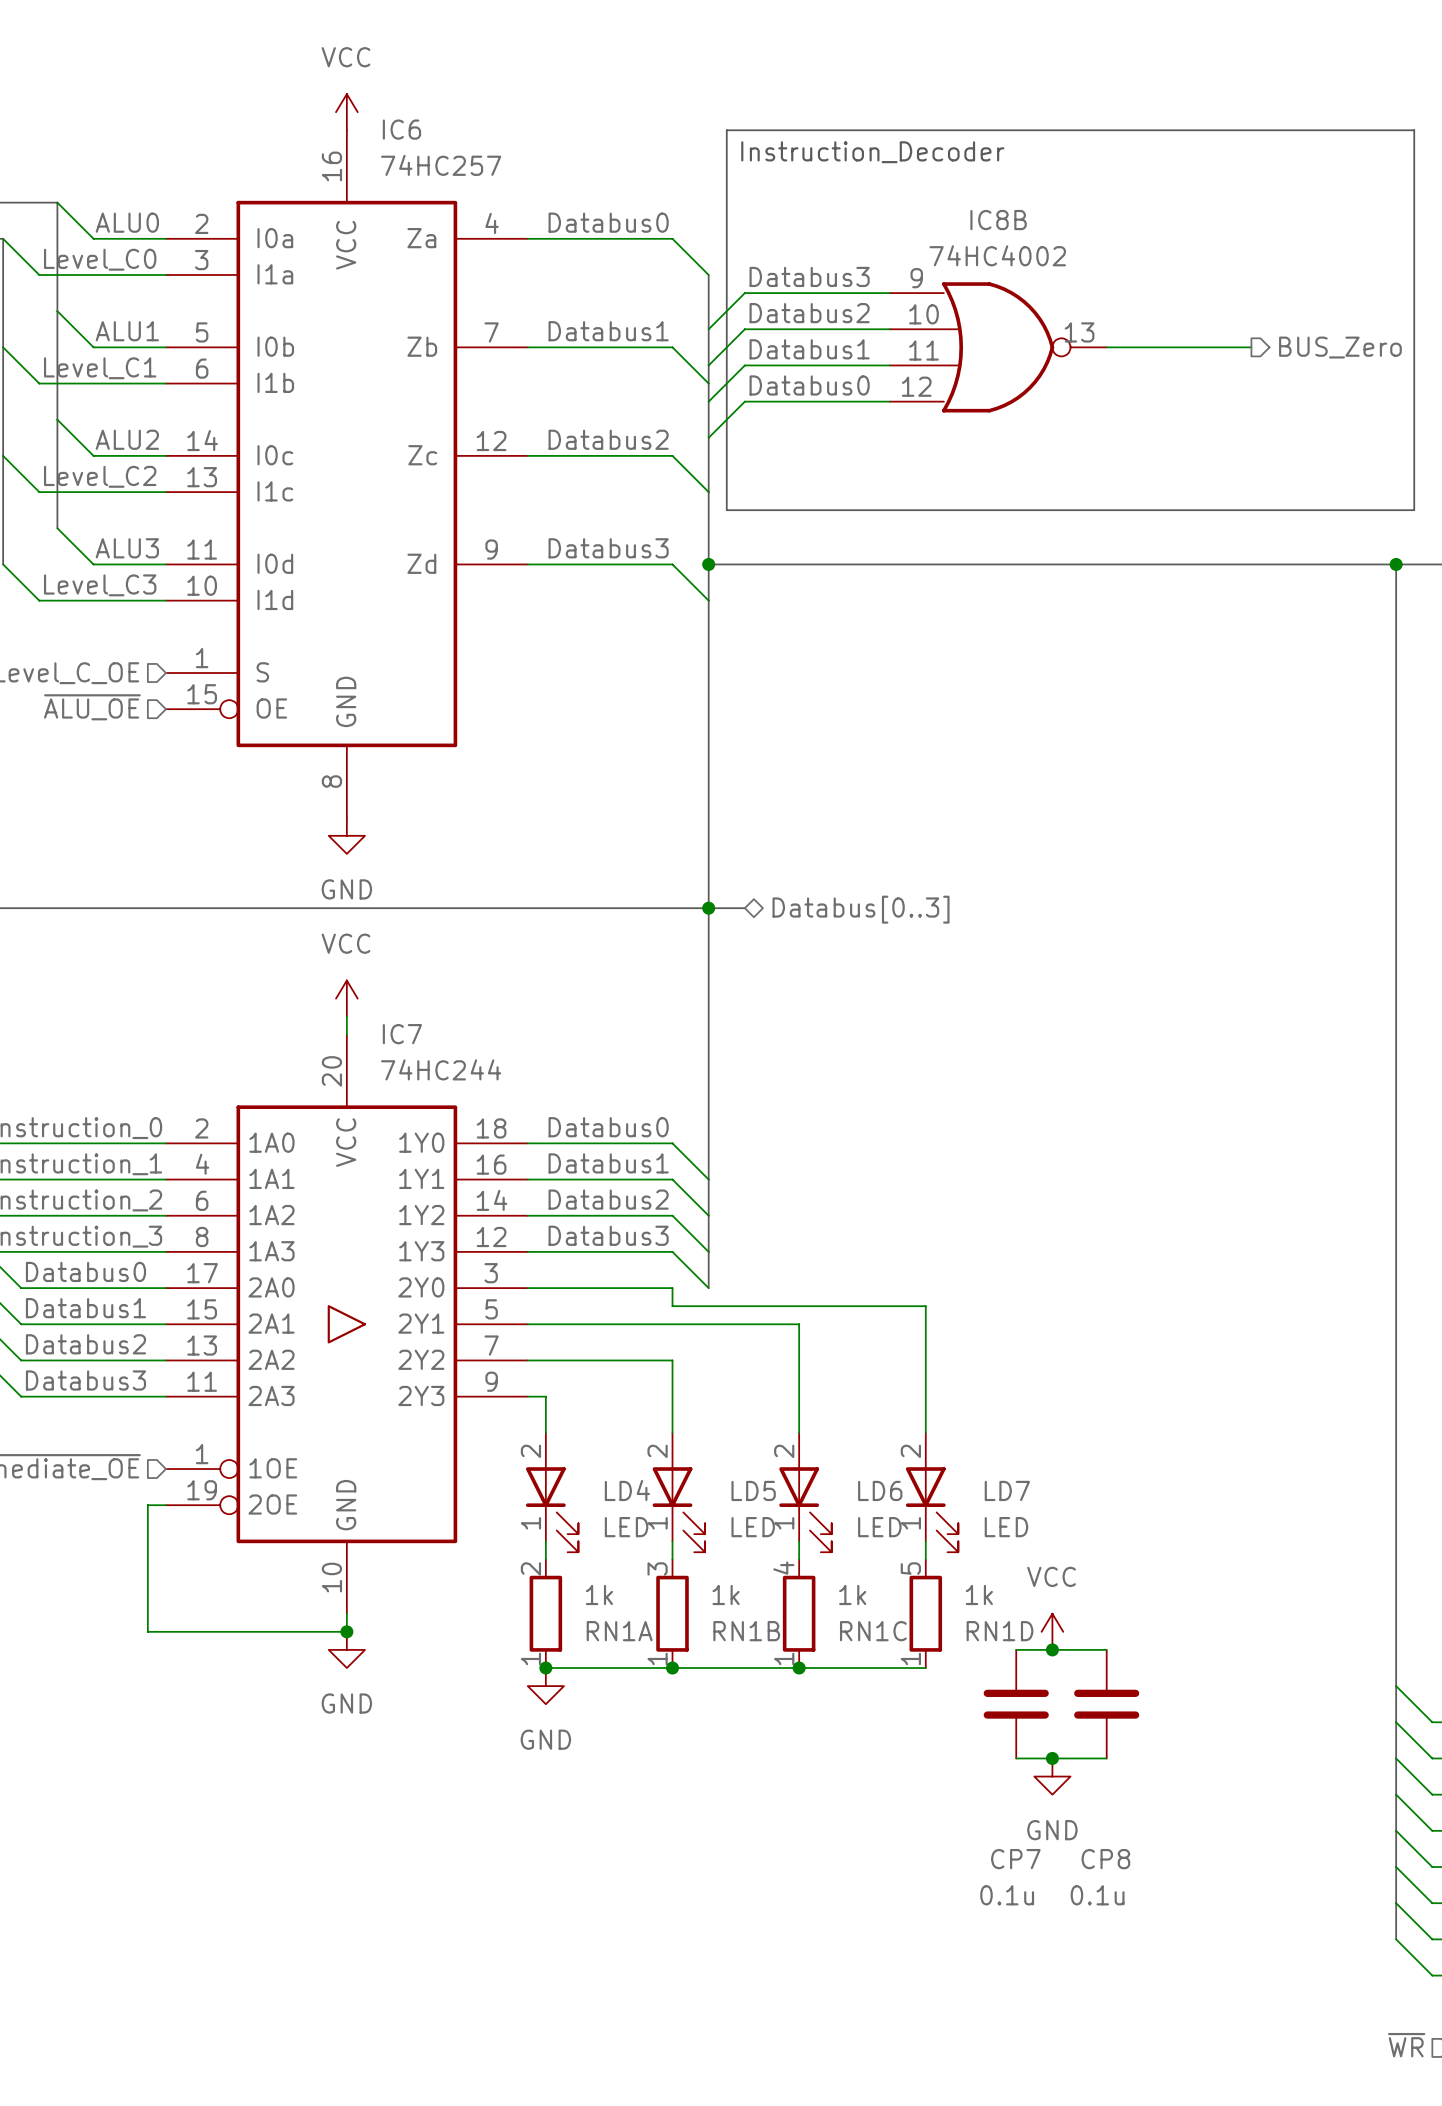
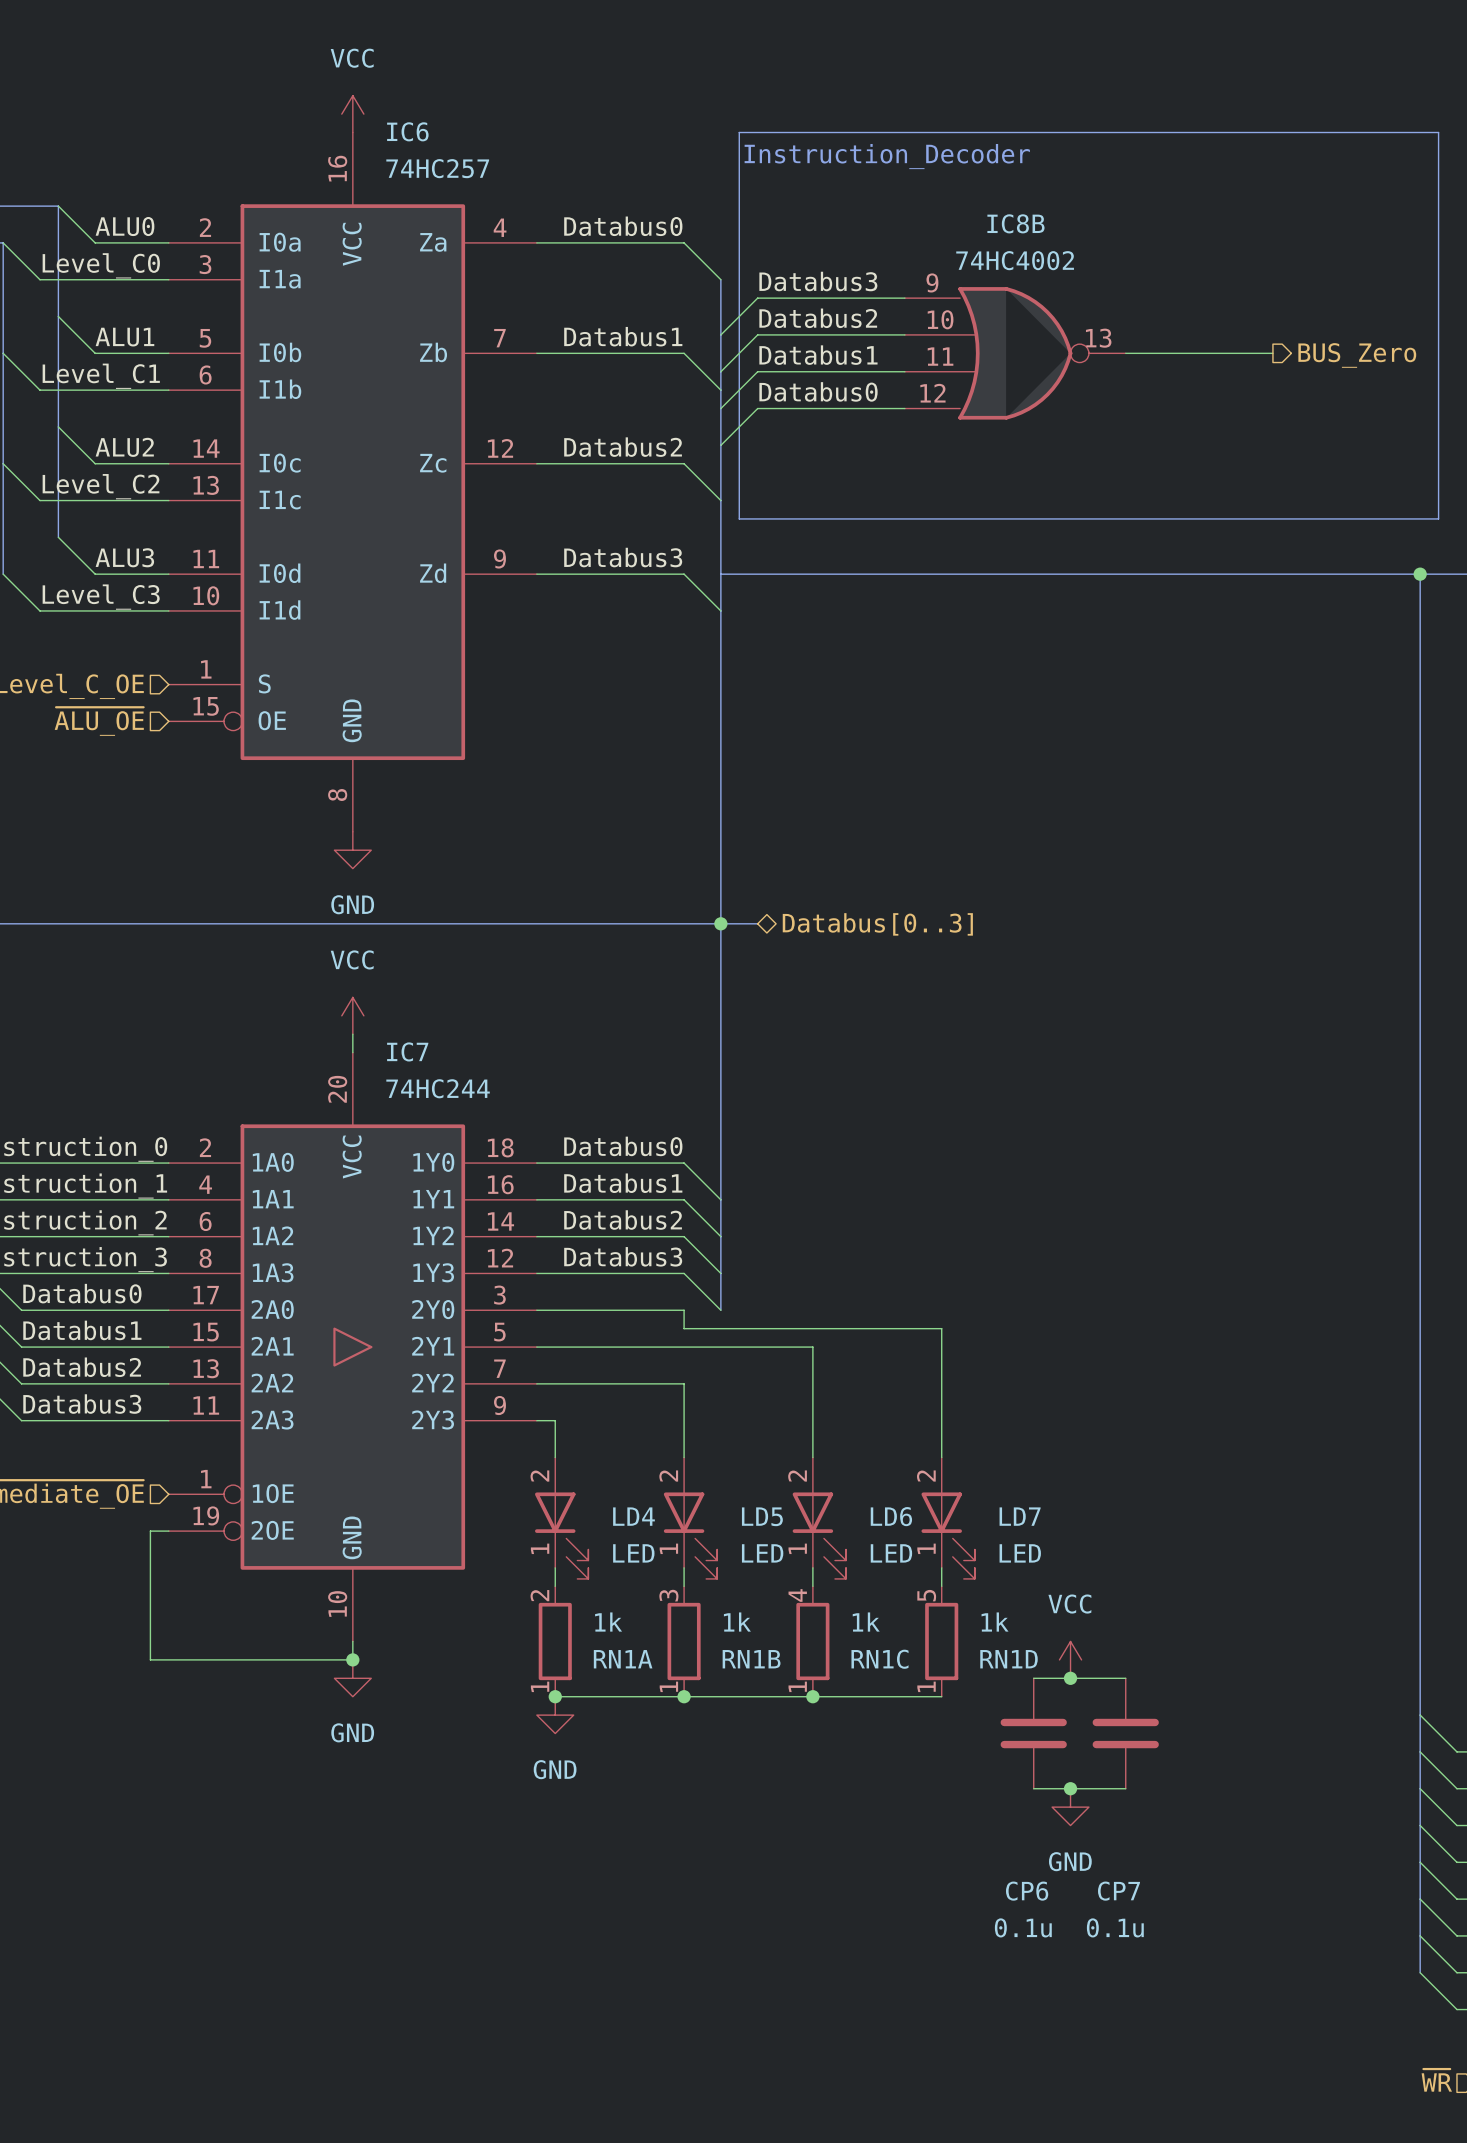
junction: (708, 564) -> none
CP7 name: CP7 (1015, 1859) -> CP6 (1027, 1891)
CP8 name: CP8 (1105, 1859) -> CP7 (1118, 1891)

